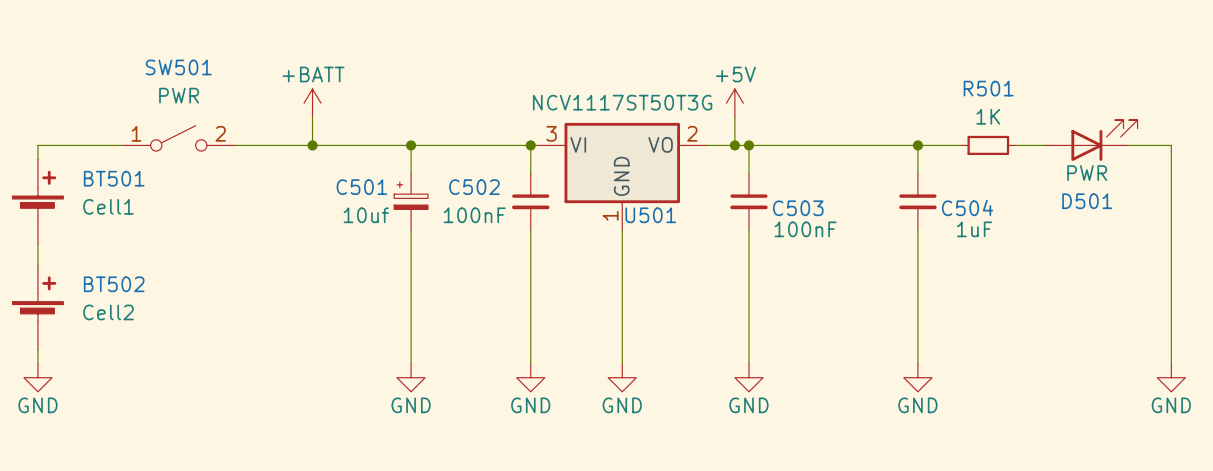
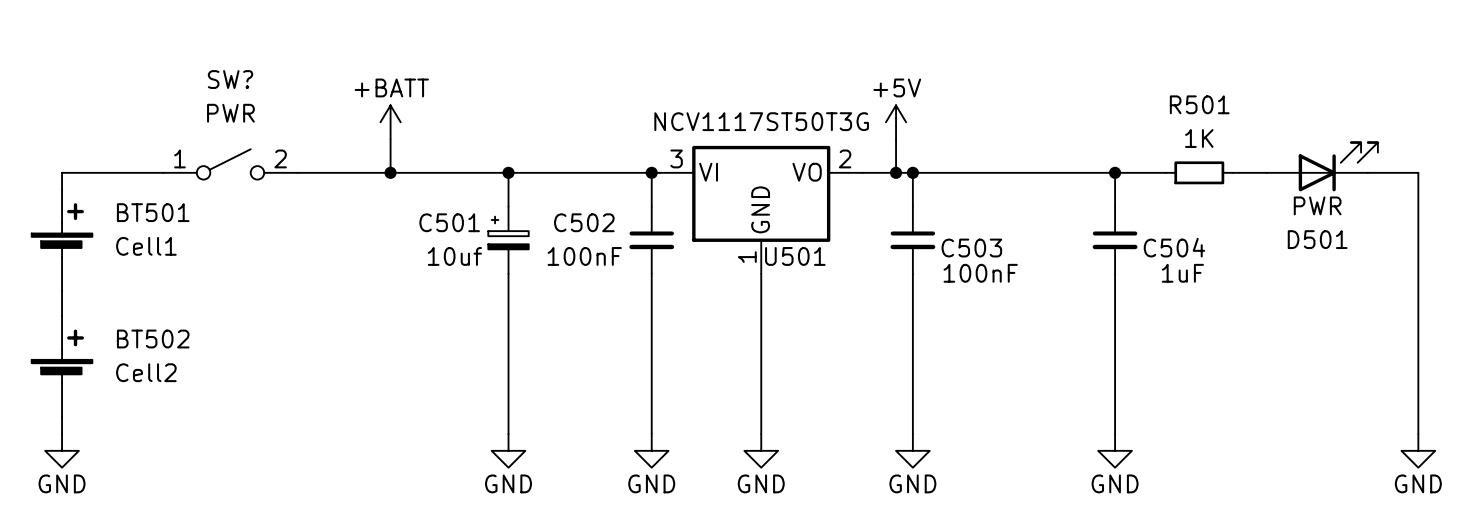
SW501 name: SW501 (178, 67) -> SW? (230, 79)

